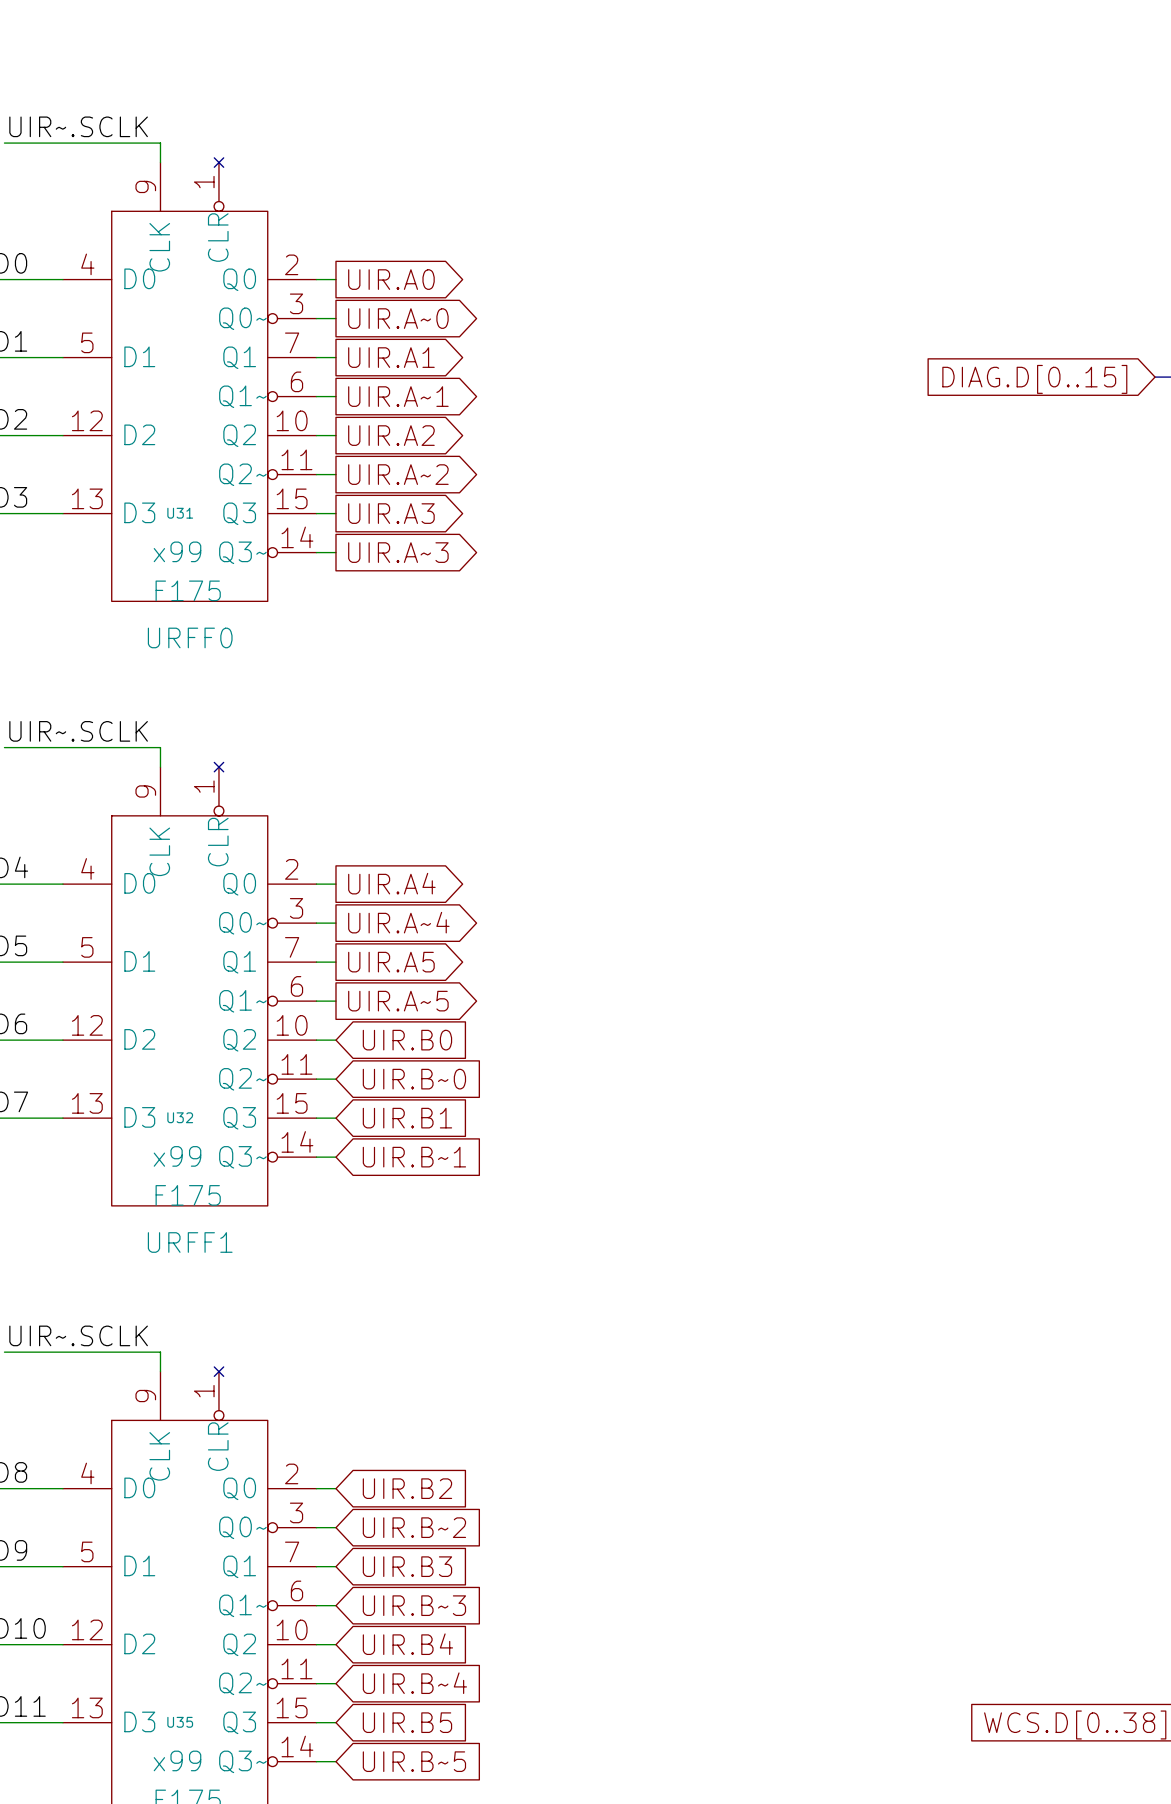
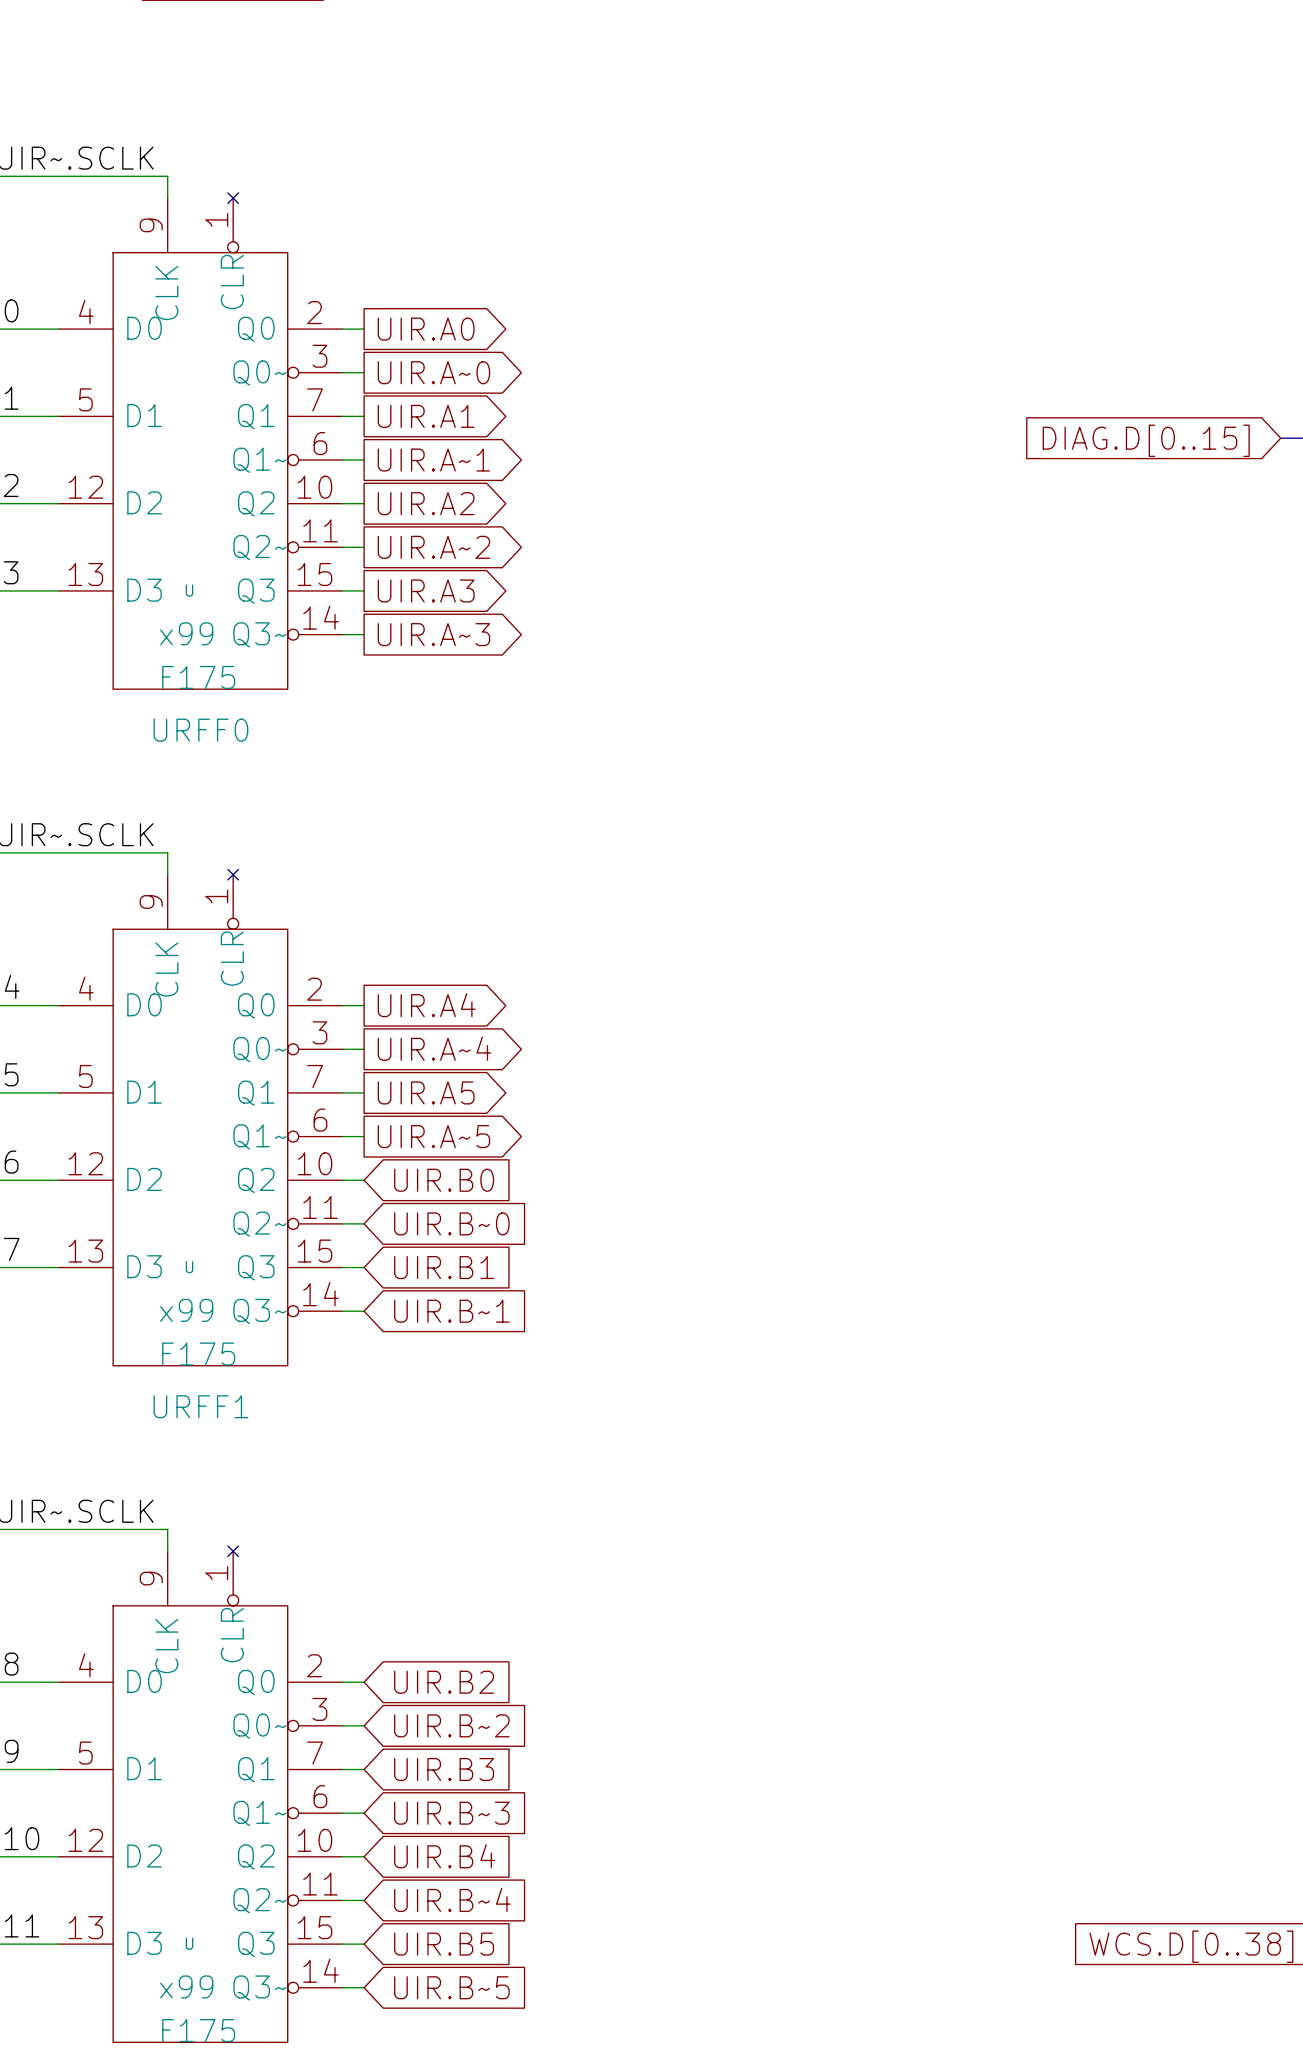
U31 name: U31 (180, 513) -> U (189, 590)
U32 name: U32 (180, 1117) -> U (189, 1267)
U35 name: U35 (180, 1722) -> U (189, 1943)

